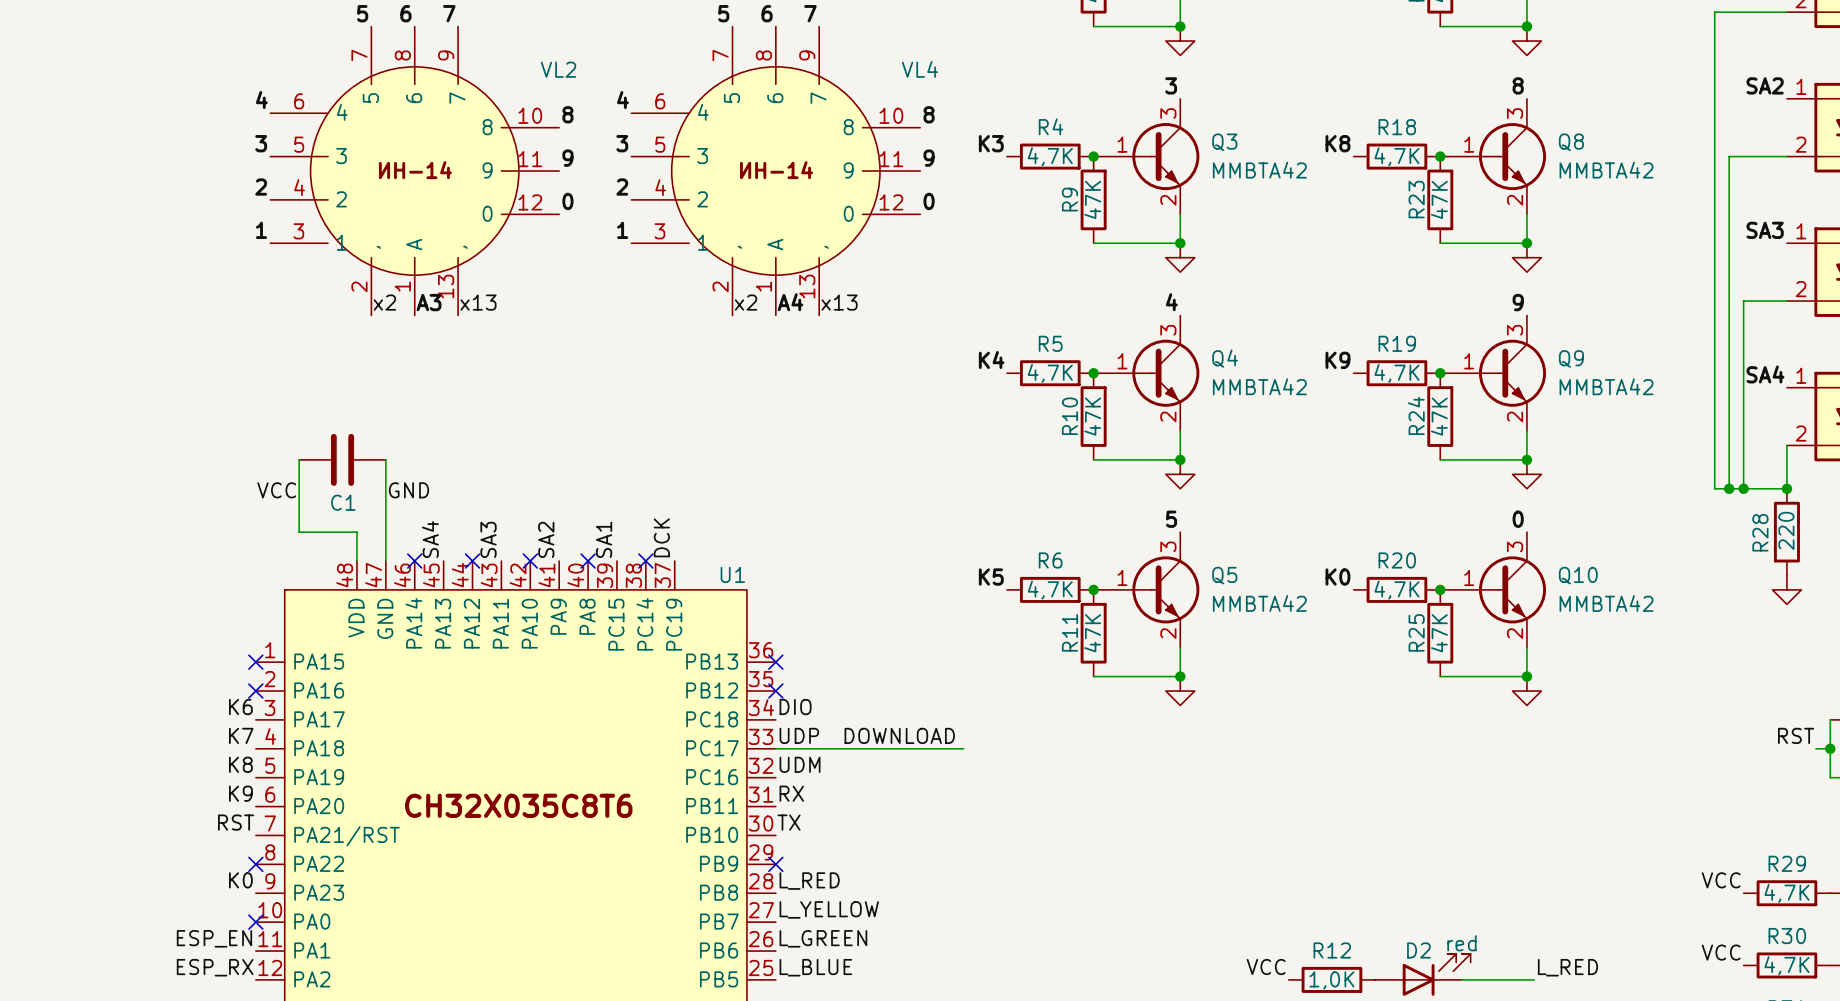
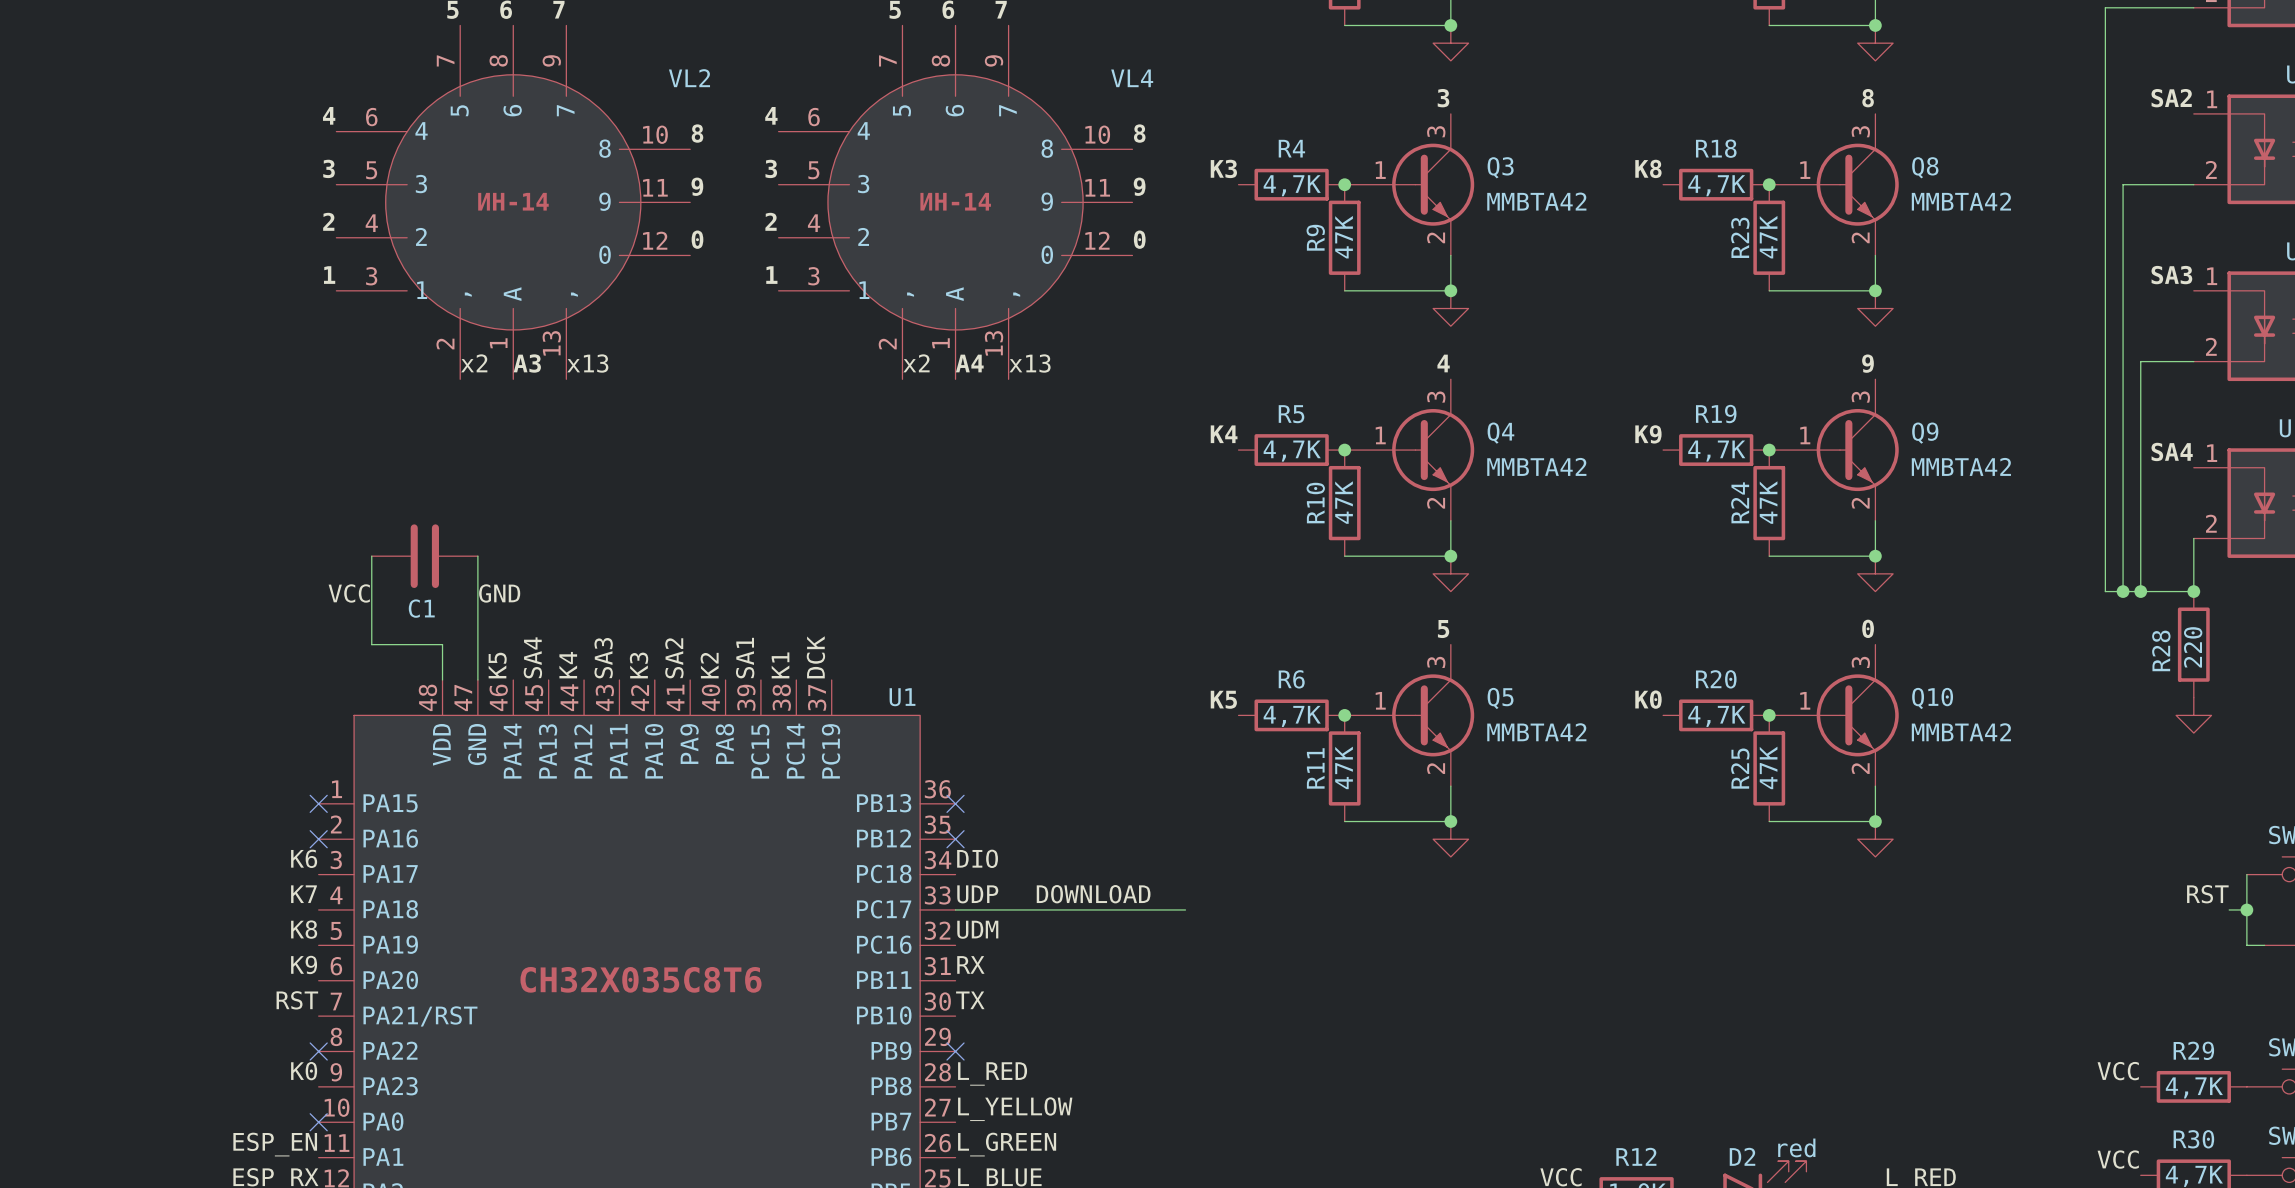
label: none -> K5 (497, 665)
label: none -> K4 (568, 665)
label: none -> K3 (639, 665)
label: none -> K2 (709, 665)
label: none -> K1 (780, 665)
no-connect mark: (414, 561) -> none
no-connect mark: (472, 561) -> none
no-connect mark: (530, 561) -> none
no-connect mark: (588, 561) -> none
no-connect mark: (645, 561) -> none

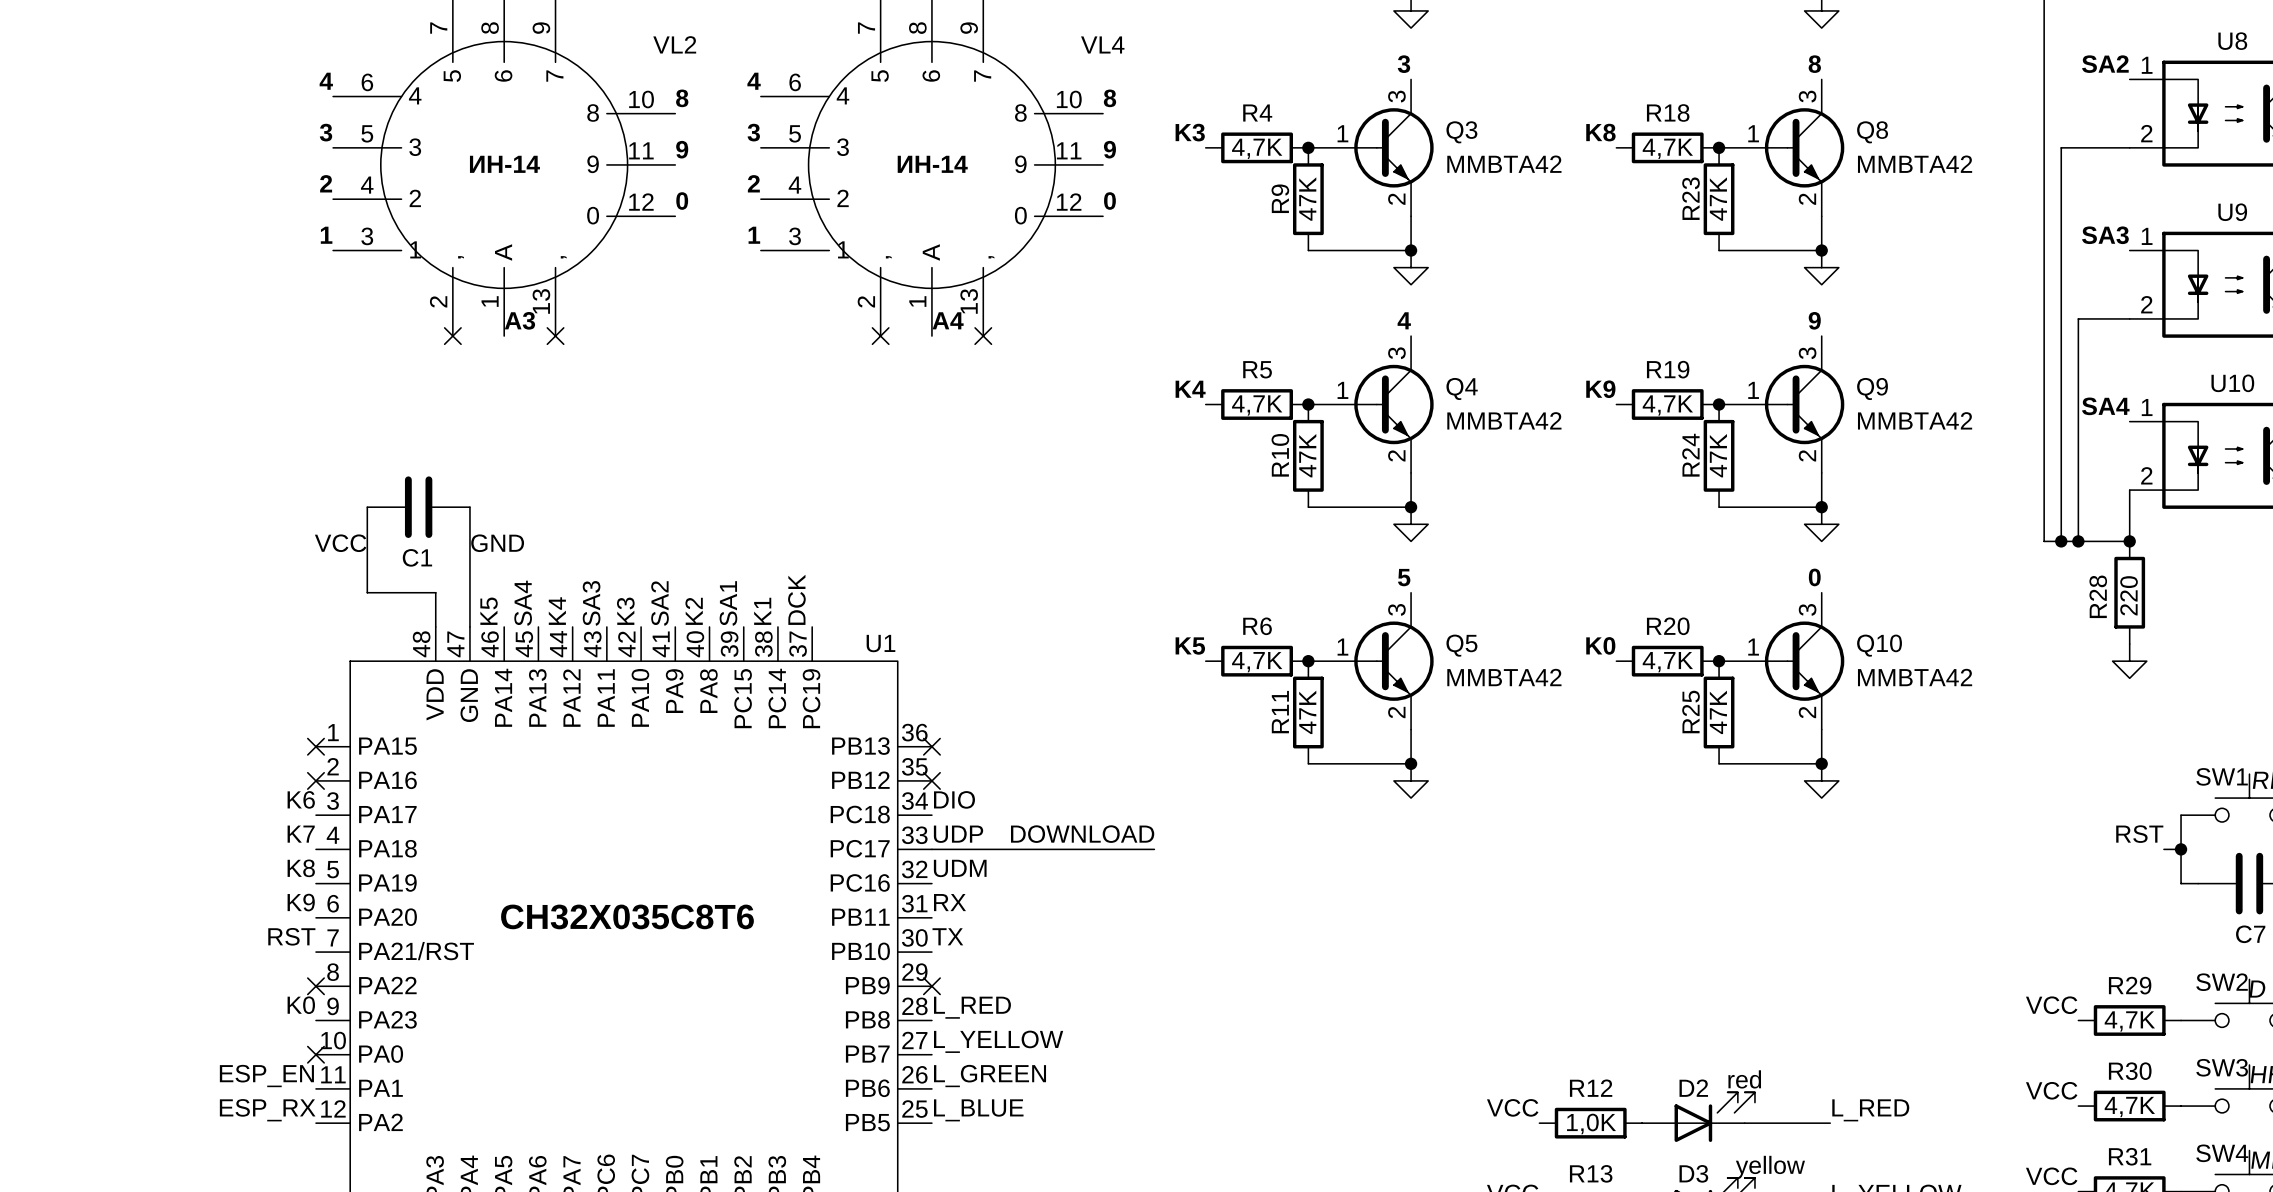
label: x2 (474, 363) -> none
label: x13 (587, 363) -> none
label: x2 (916, 363) -> none
label: x13 (1030, 363) -> none
no-connect mark: none -> (452, 336)
no-connect mark: none -> (555, 336)
no-connect mark: none -> (880, 336)
no-connect mark: none -> (983, 336)

